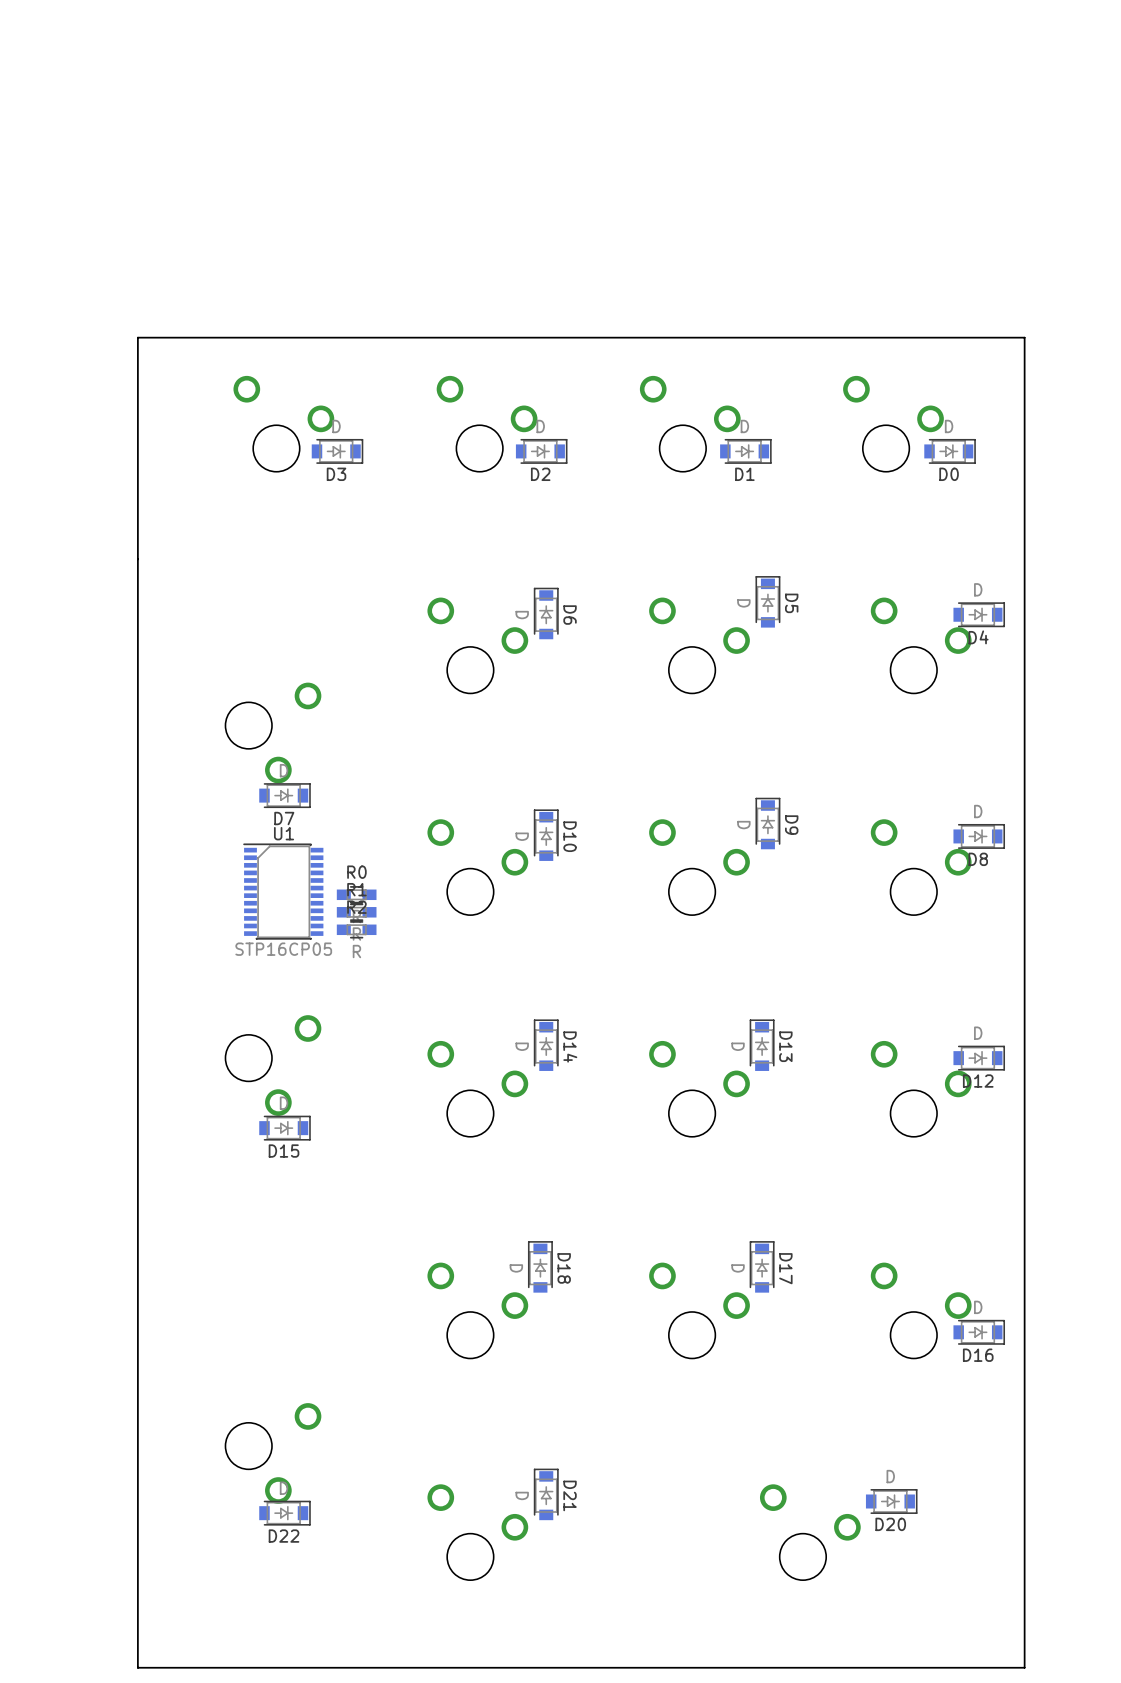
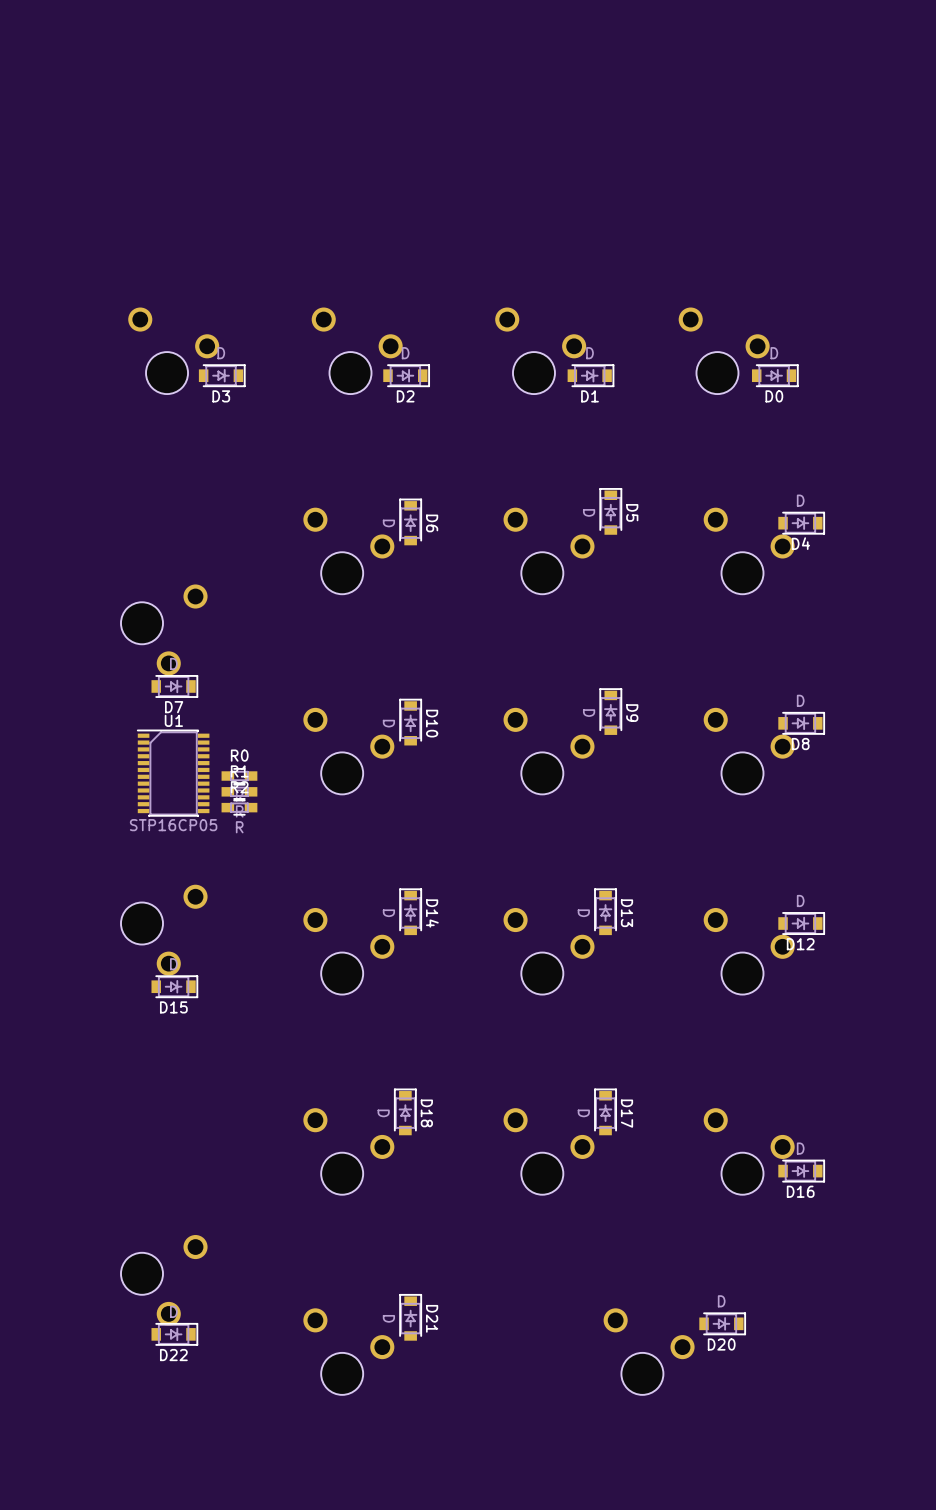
board edge: (1024, 337) (137, 337) (137, 1667) (1024, 1667) (1024, 337) -> none

